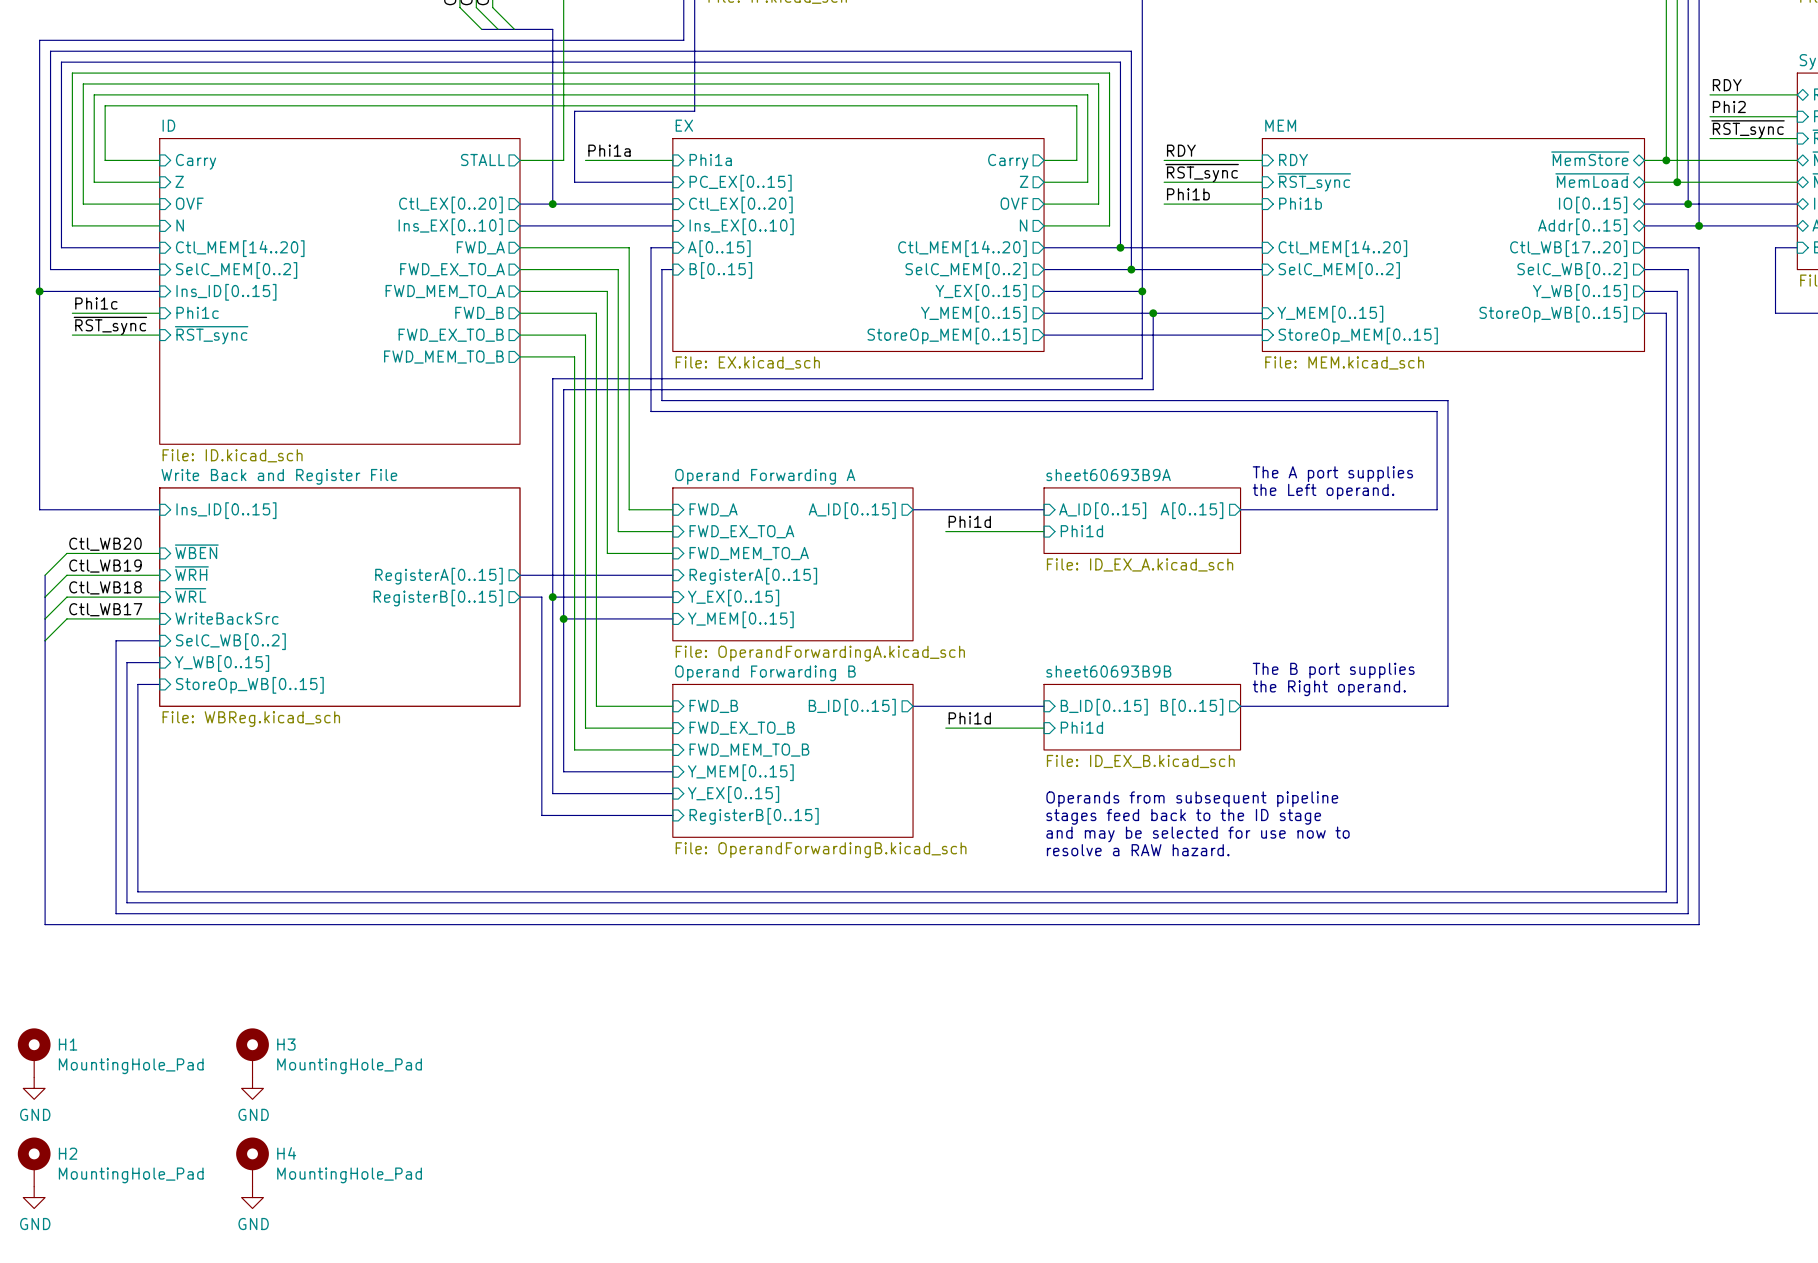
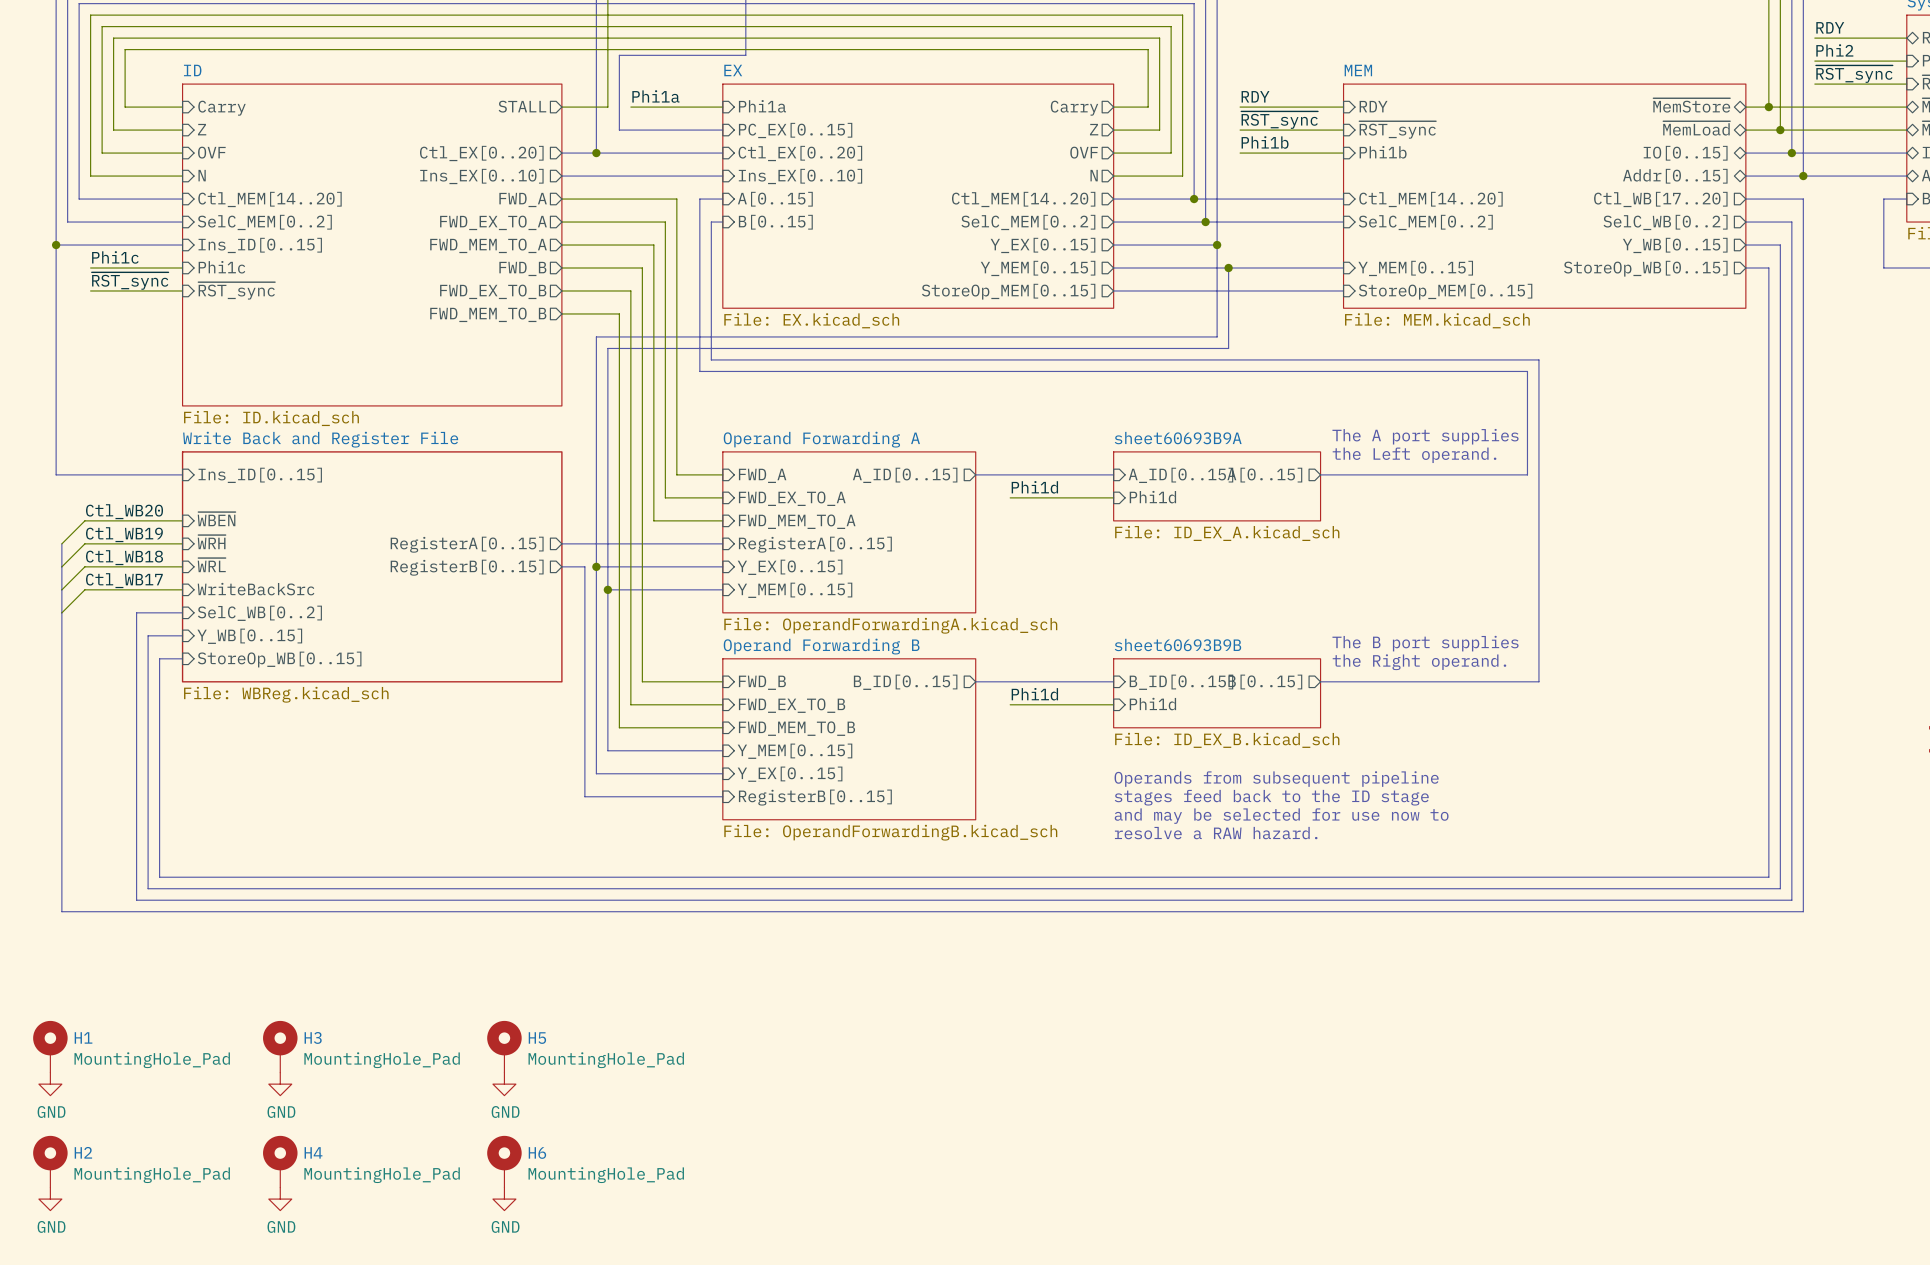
H5: none -> MountingHole_Pad (504, 1046)
power symbol: none -> GND (504, 1084)
H6: none -> MountingHole_Pad (504, 1161)
power symbol: none -> GND (504, 1199)

